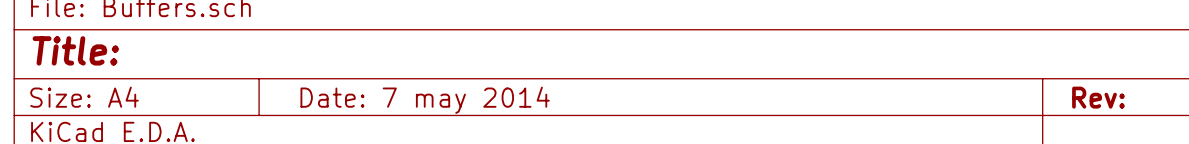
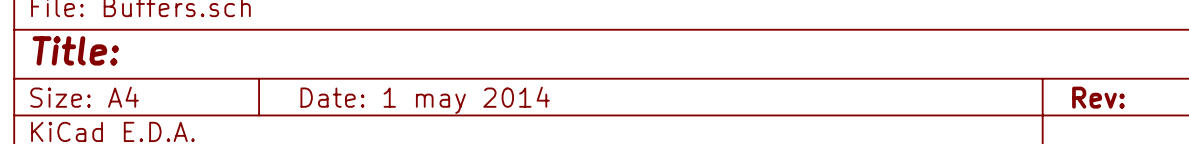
title block: Date: 7 may 2014 (425, 100) -> Date: 1 may 2014 (425, 100)

